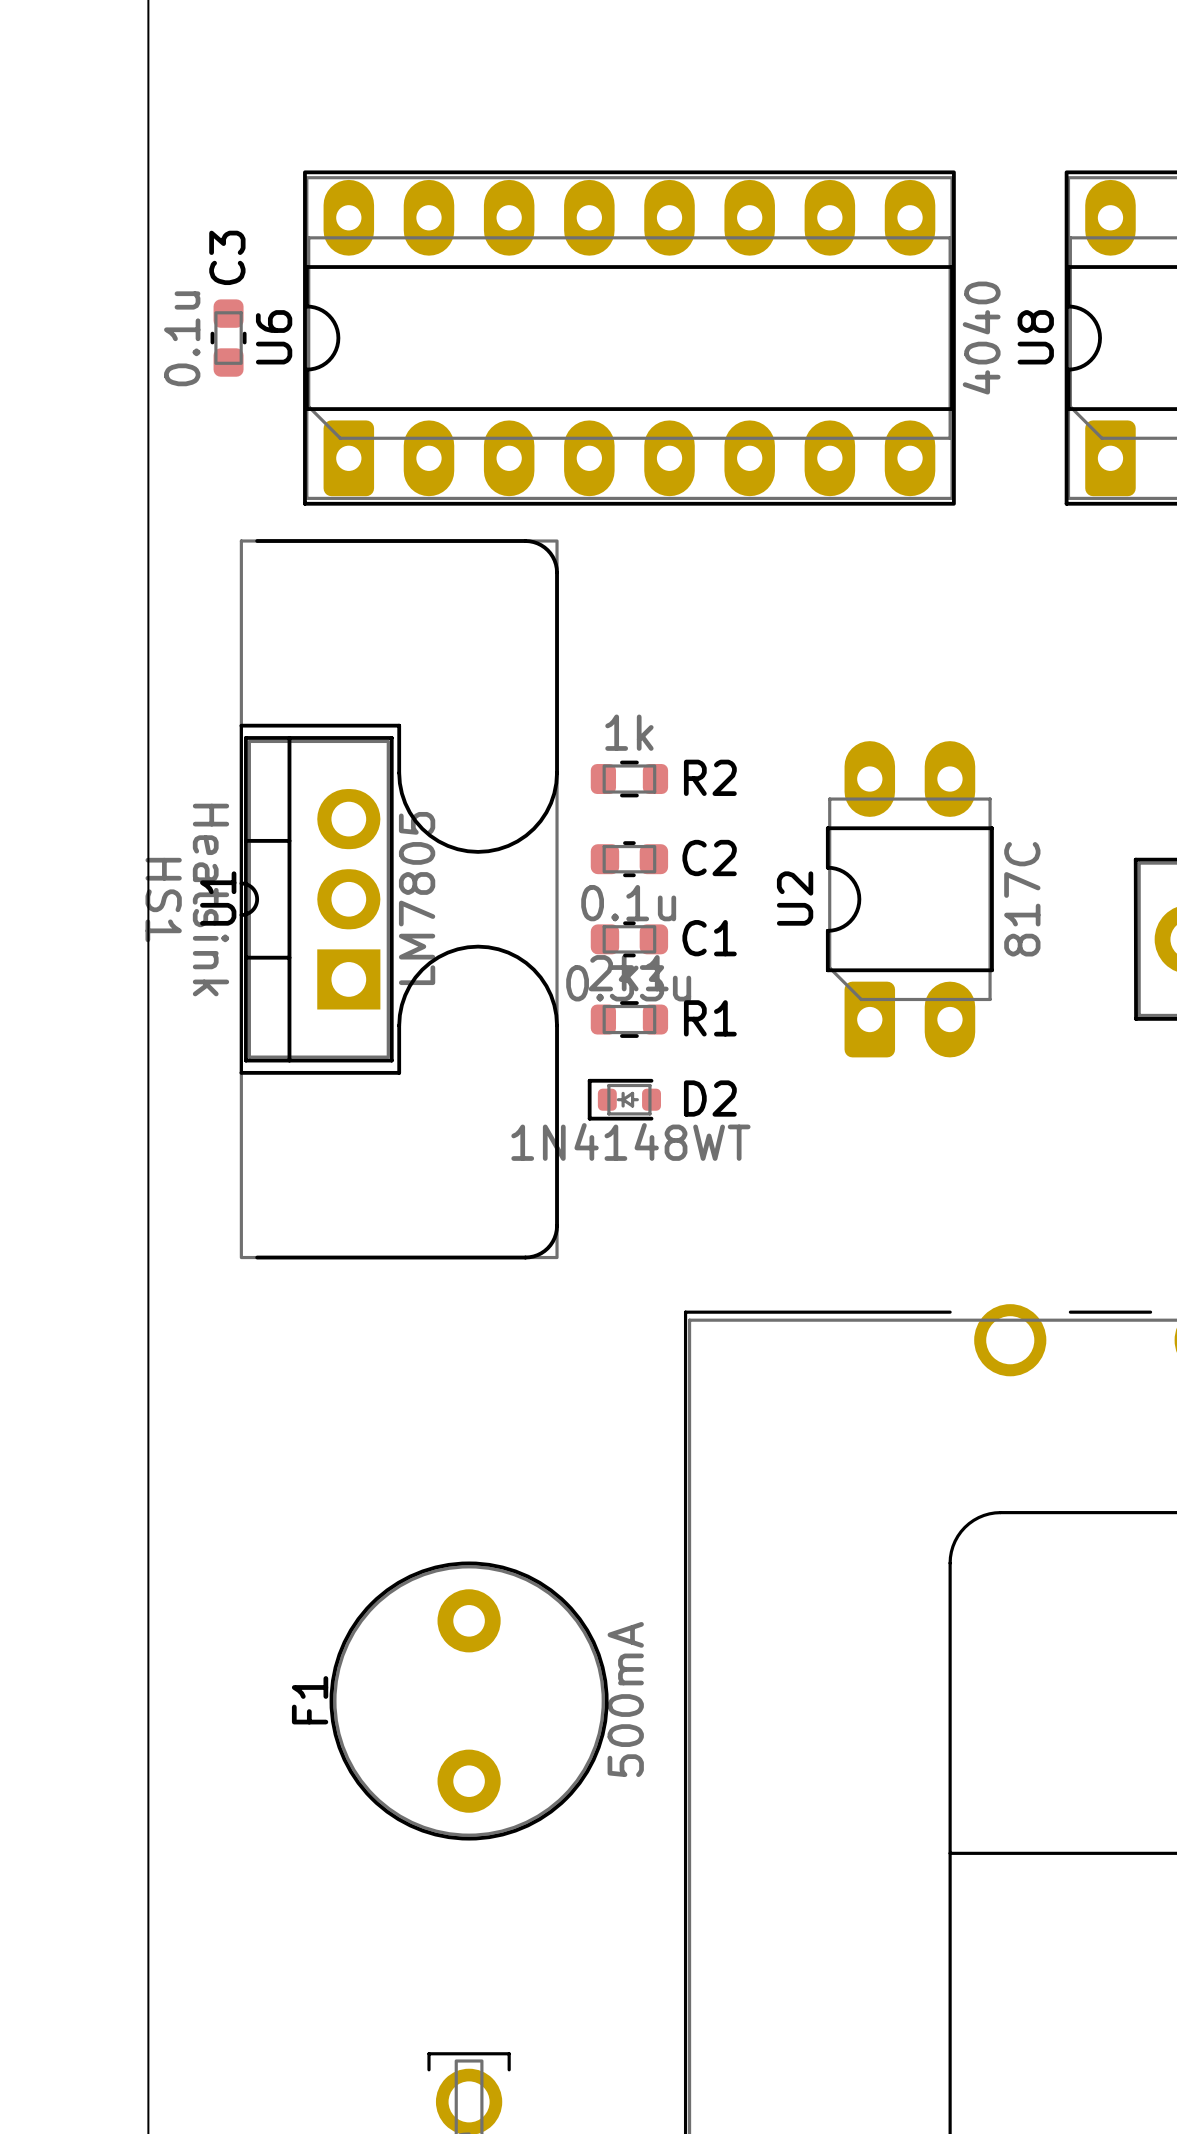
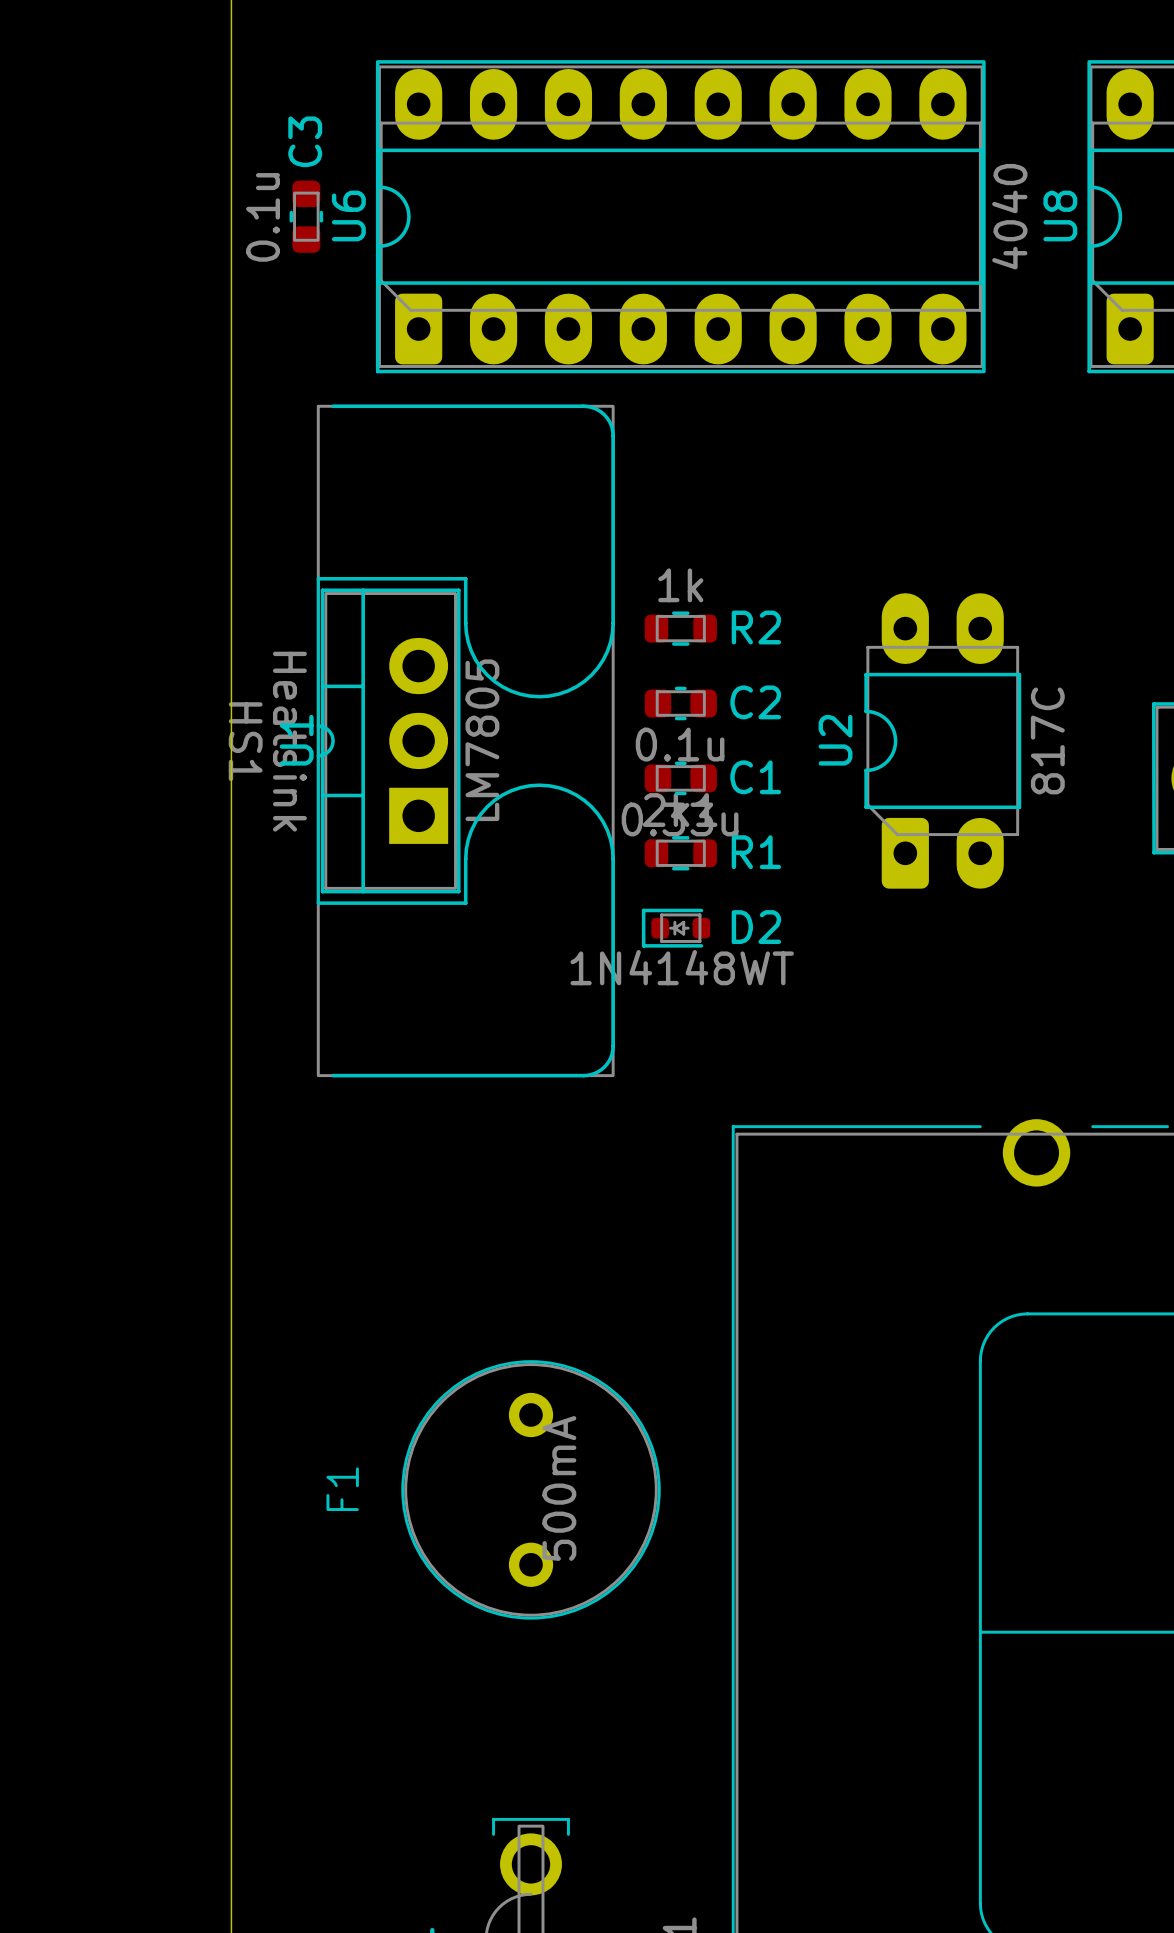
F1 footprint: [329, 1561, 609, 1841] -> [401, 1360, 661, 1620]
F1 value position: 500mA (625, 1699) -> 500mA (559, 1488)
F1 name position: F1 (310, 1700) -> F1 (342, 1489)

